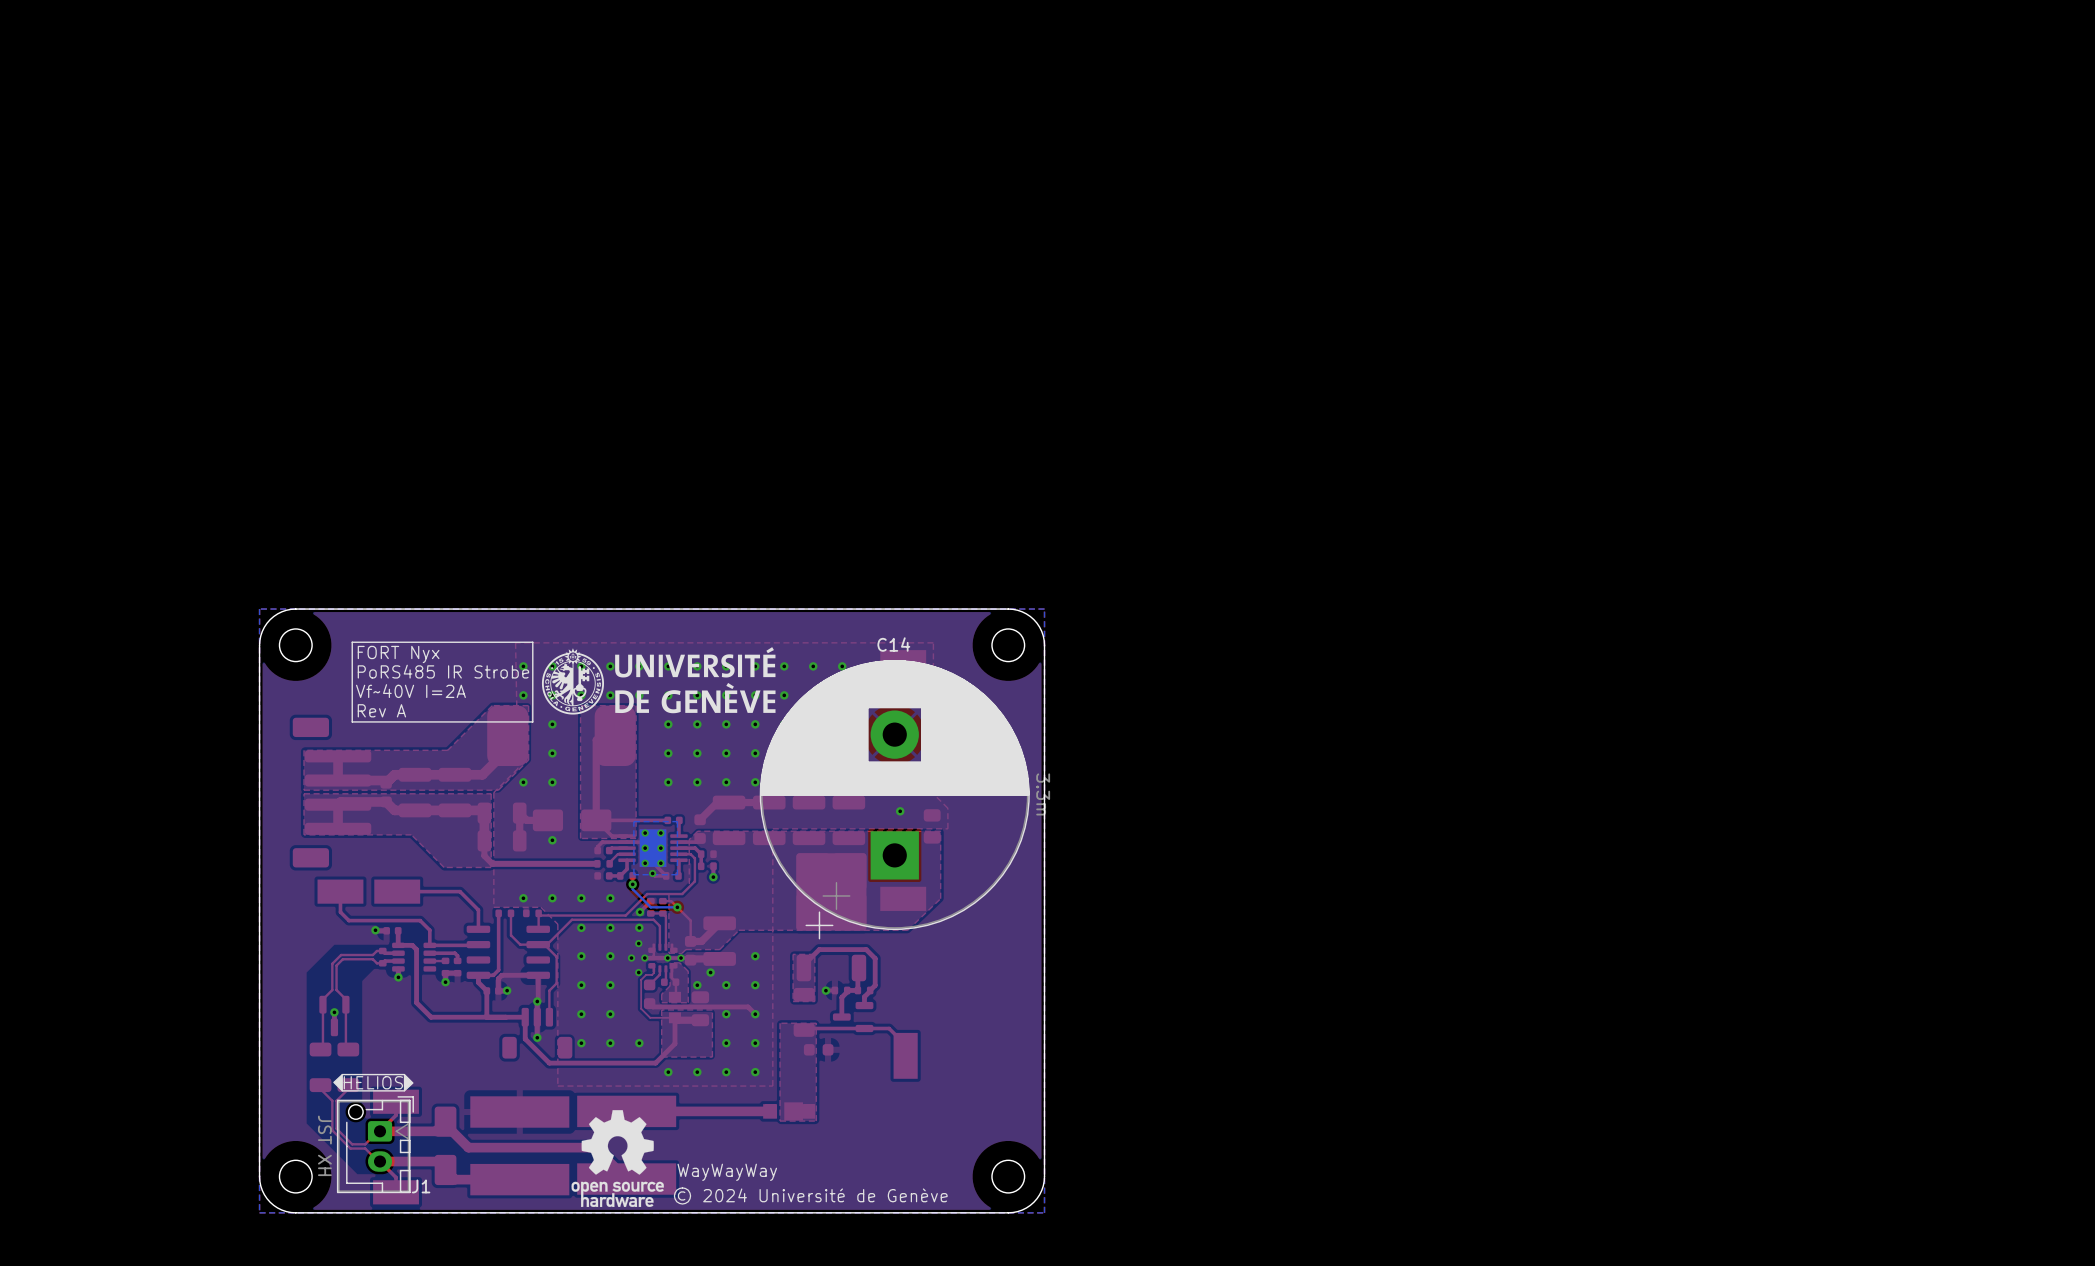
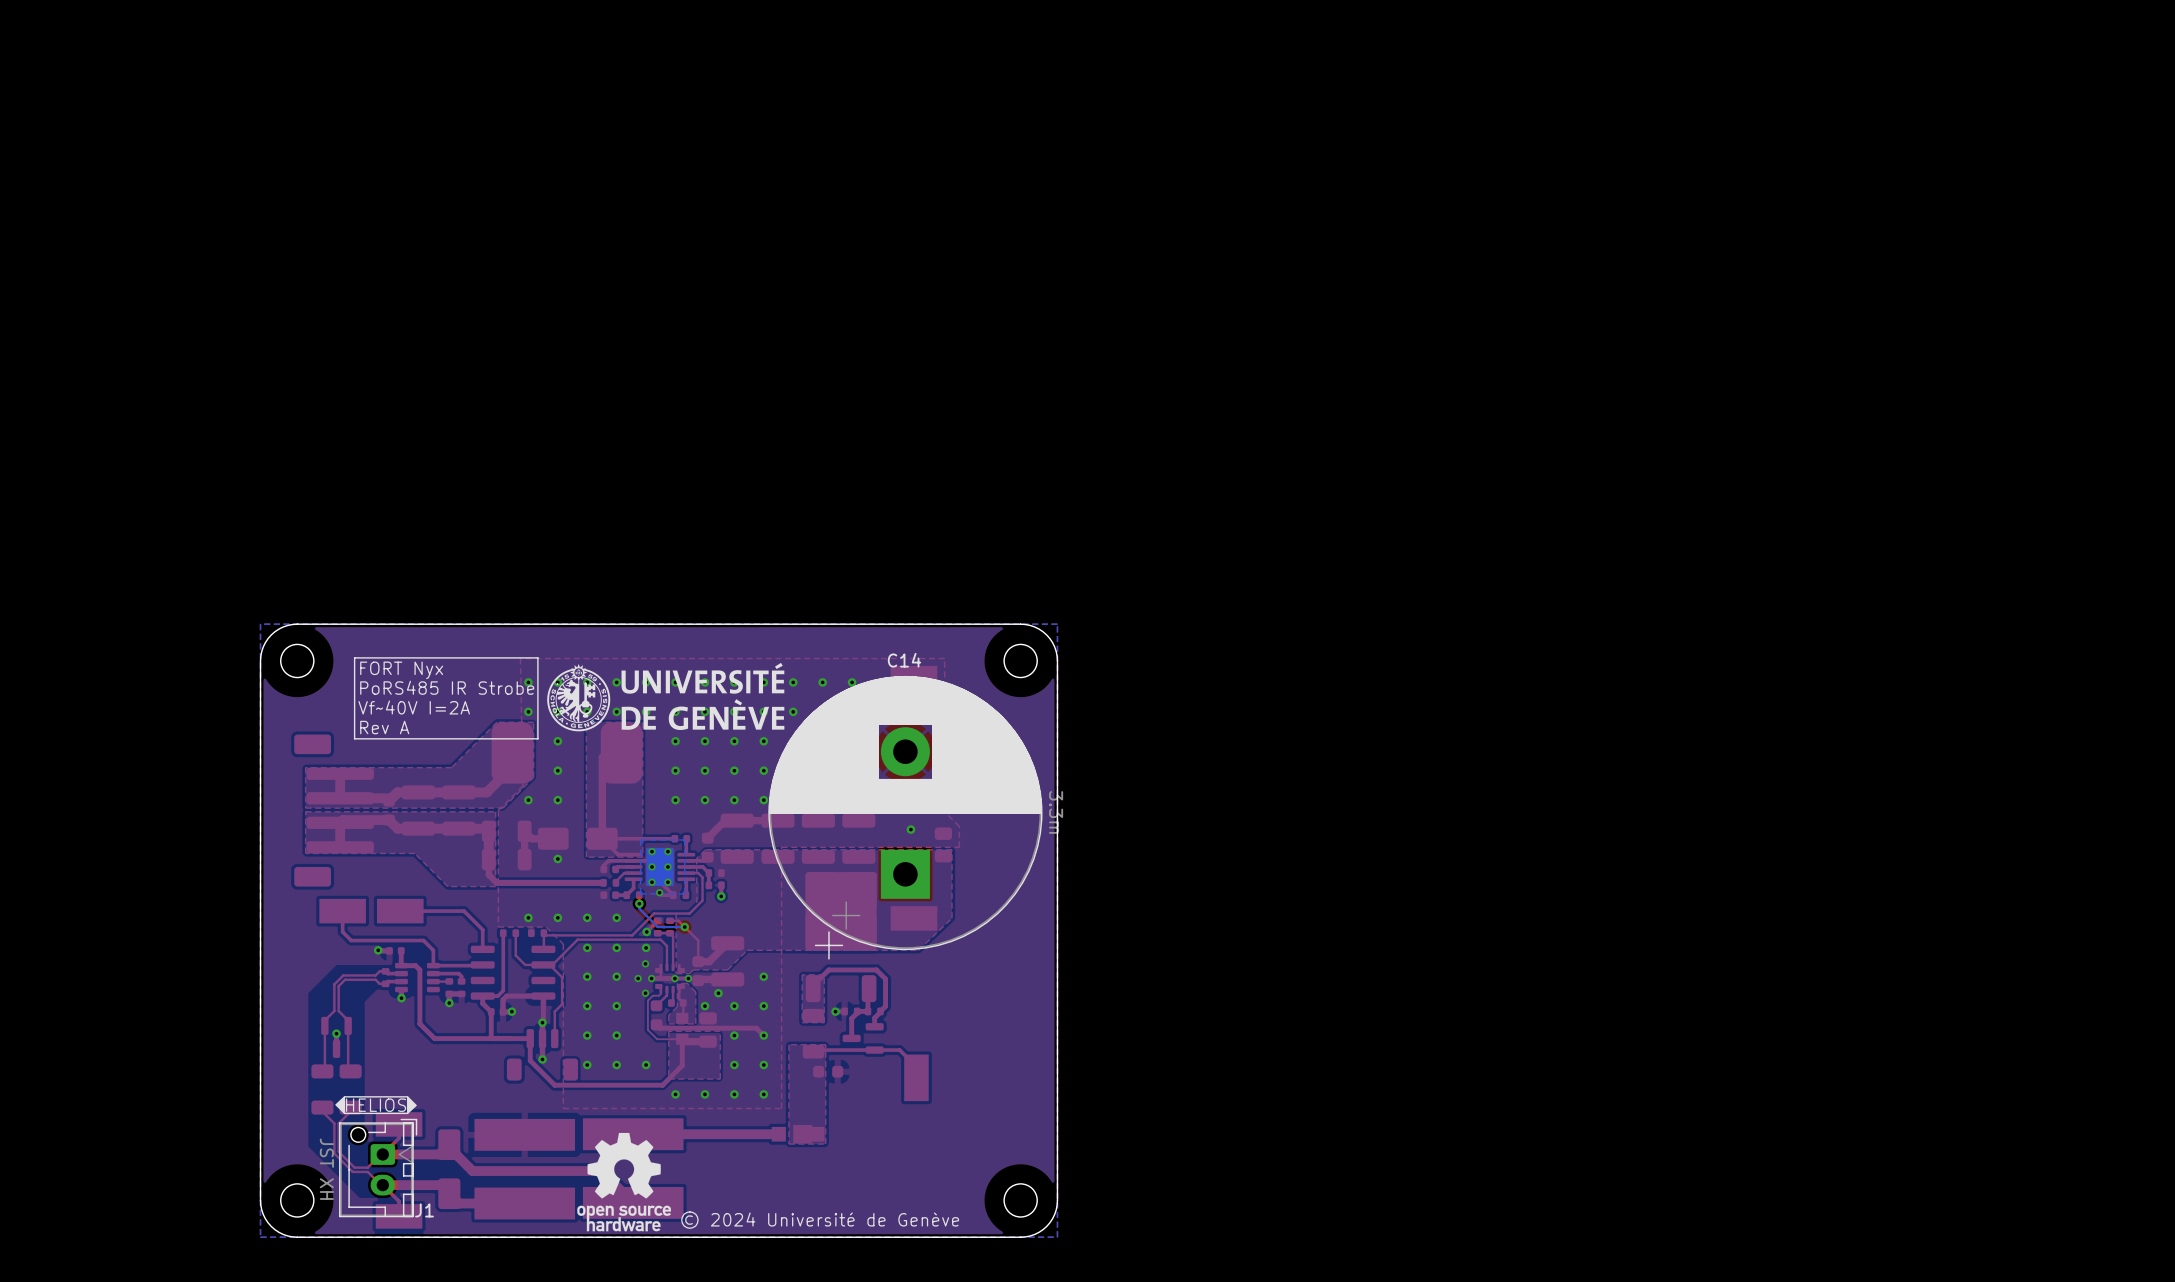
text: WayWayWay (727, 1172) -> none

